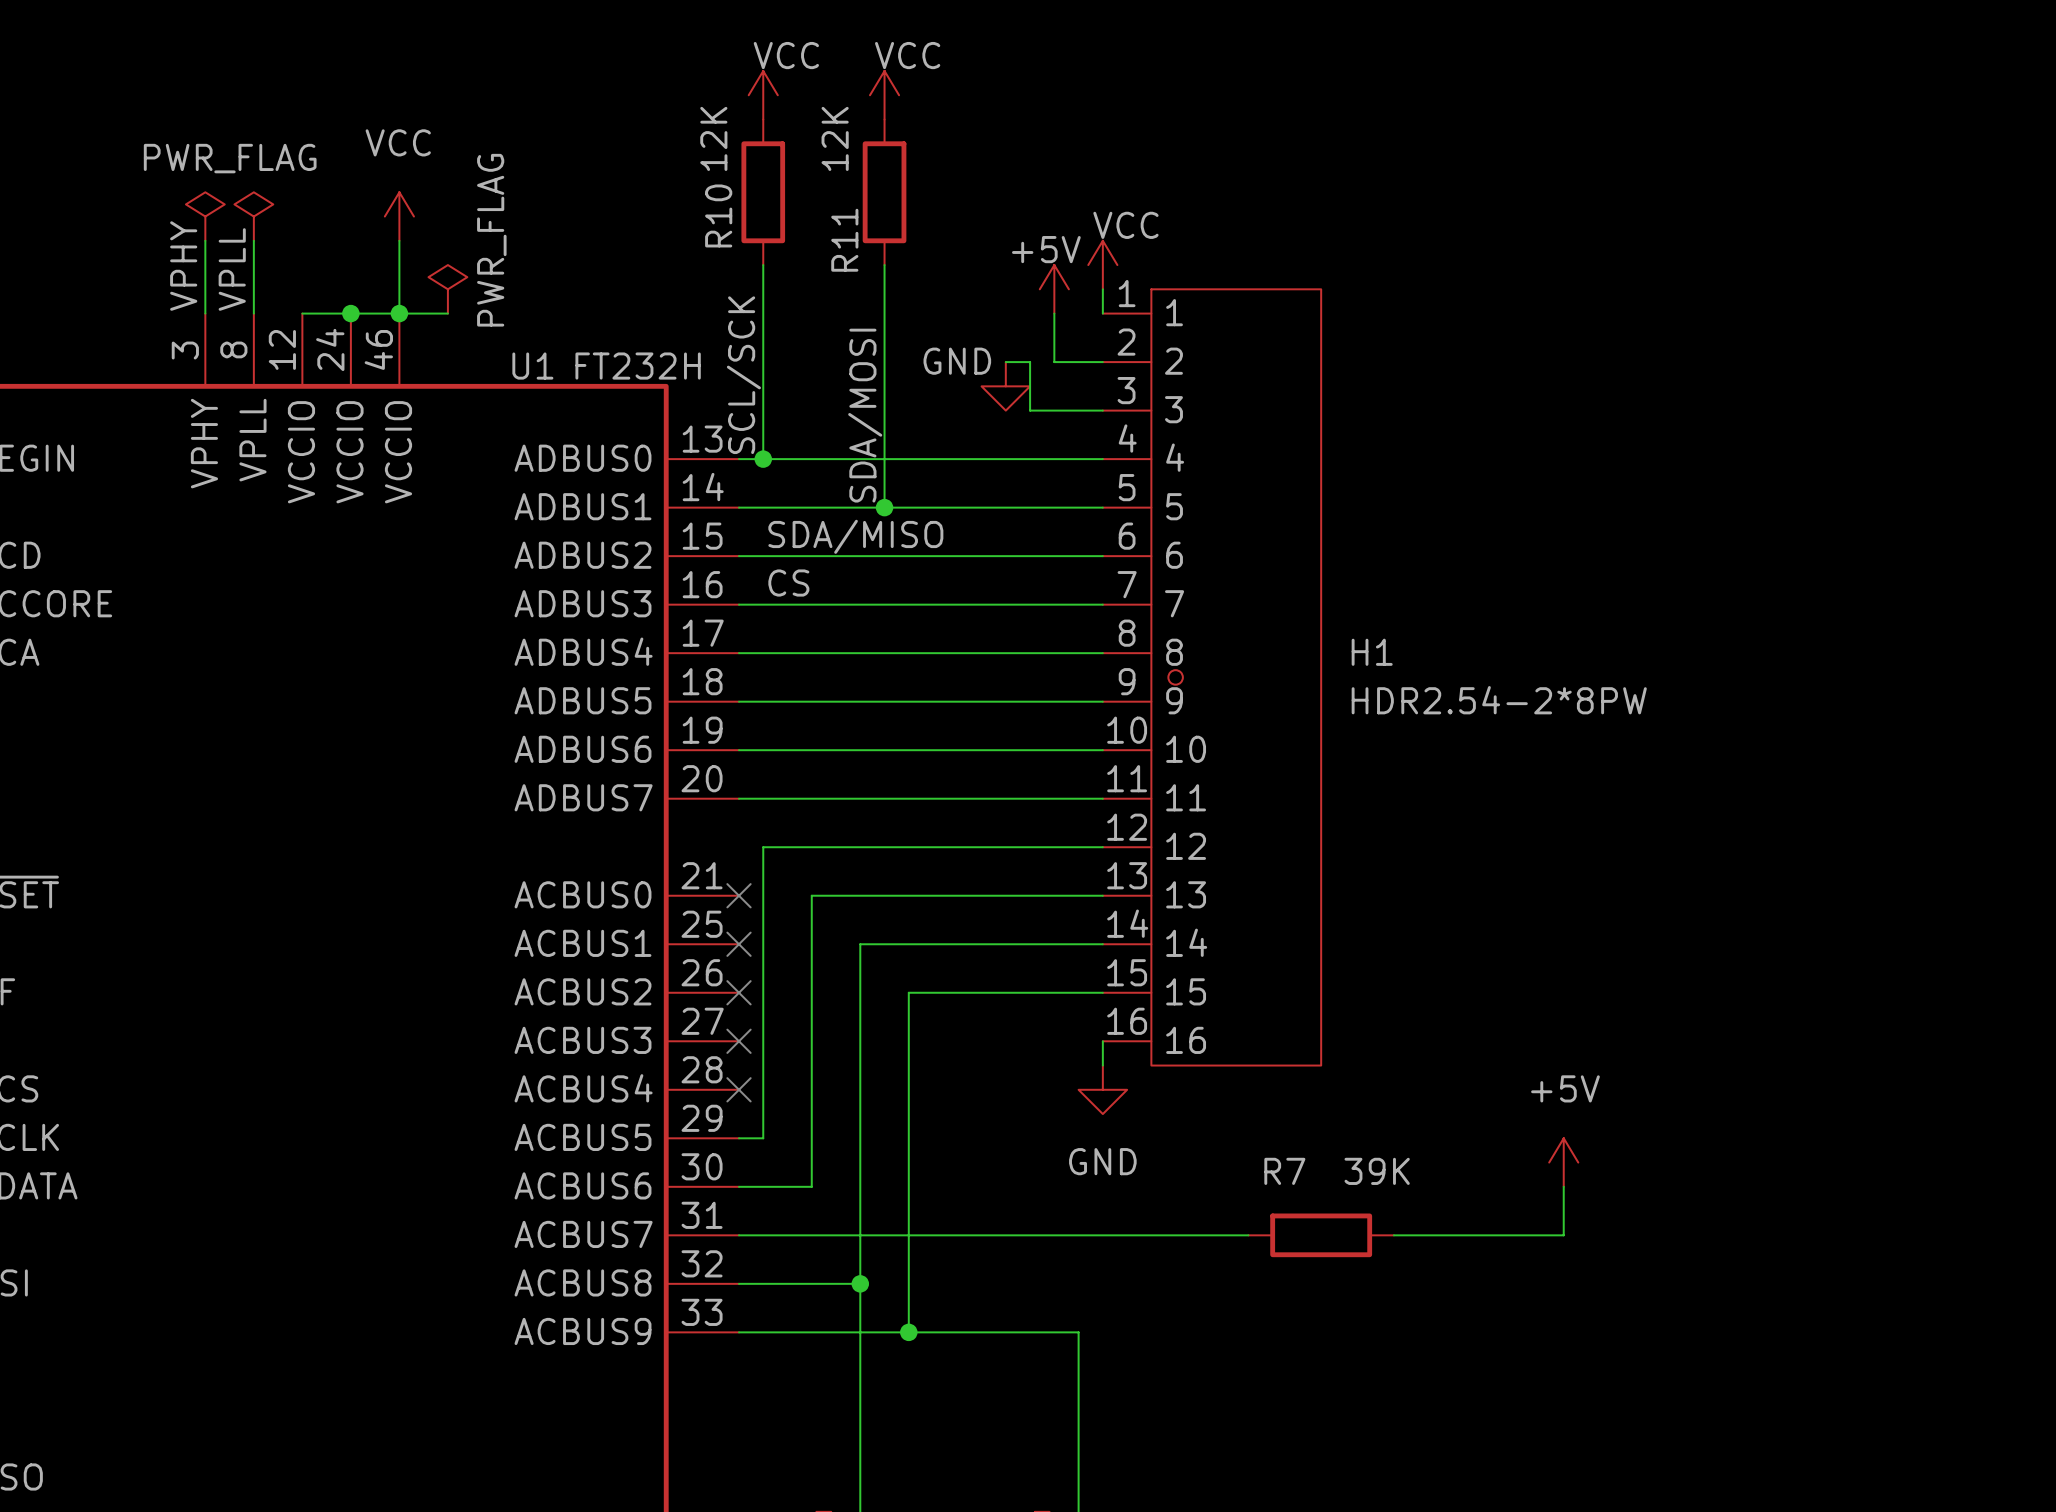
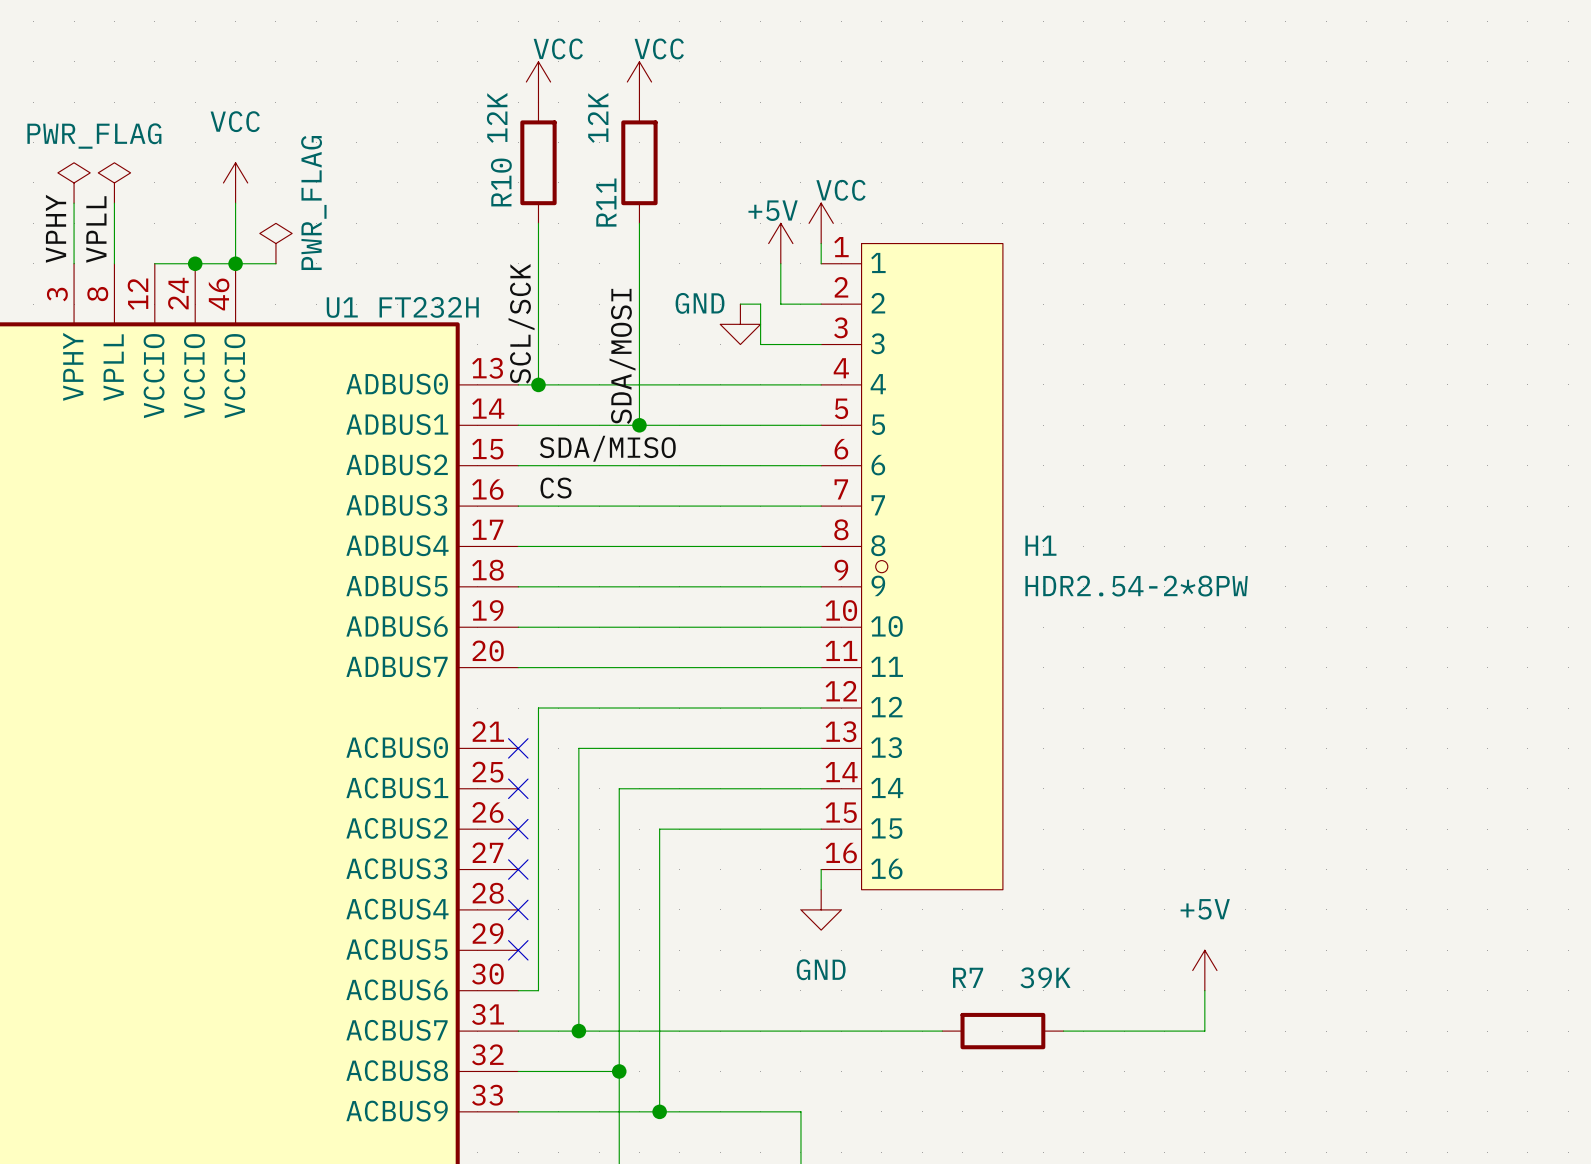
wire: (739, 1138) (763, 1138) -> (538, 990) (538, 950)
no-connect mark: none -> (518, 950)
wire: (763, 1186) (811, 1186) -> (578, 1031) (578, 990)
junction: none -> (578, 1031)

